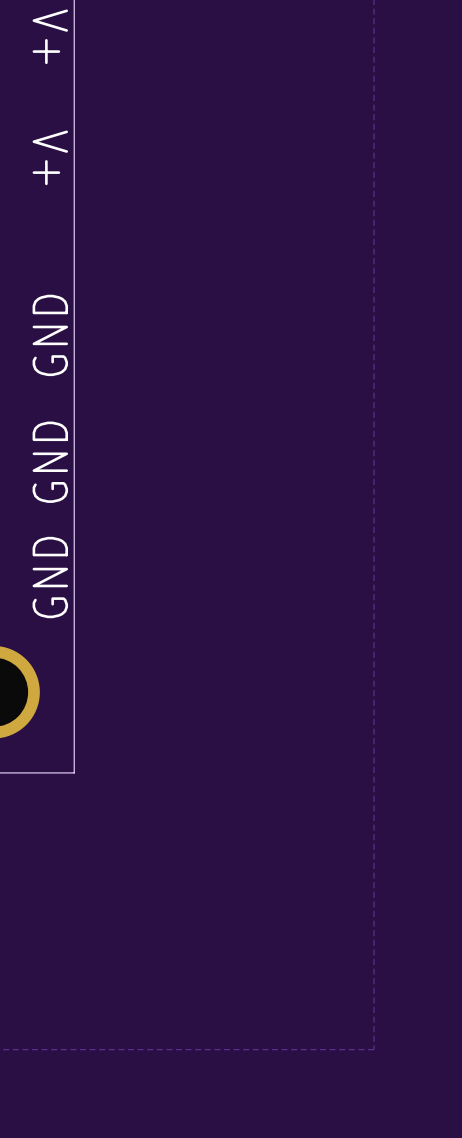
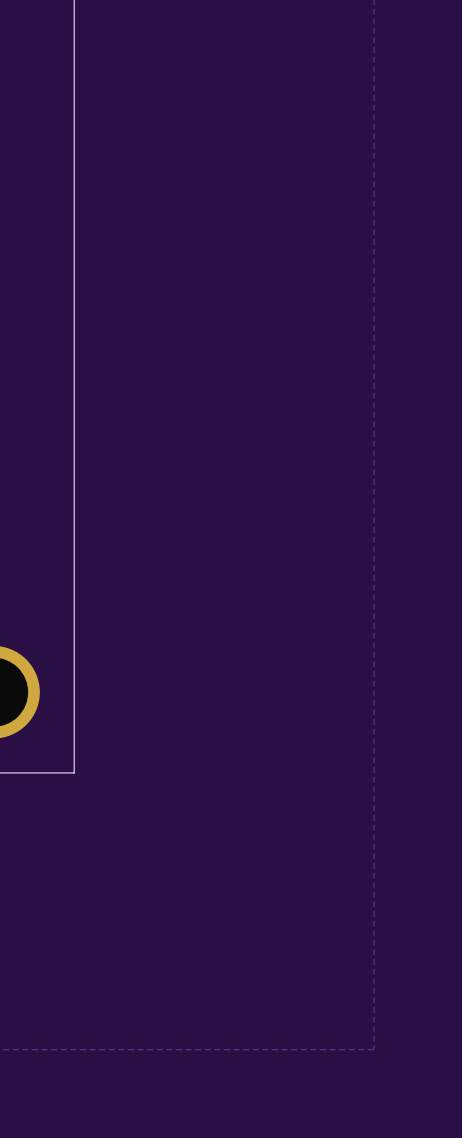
text: V+ (50, 36) -> none
text: V+ (50, 157) -> none
text: GND (50, 335) -> none
text: GND (50, 462) -> none
text: GND (50, 577) -> none

